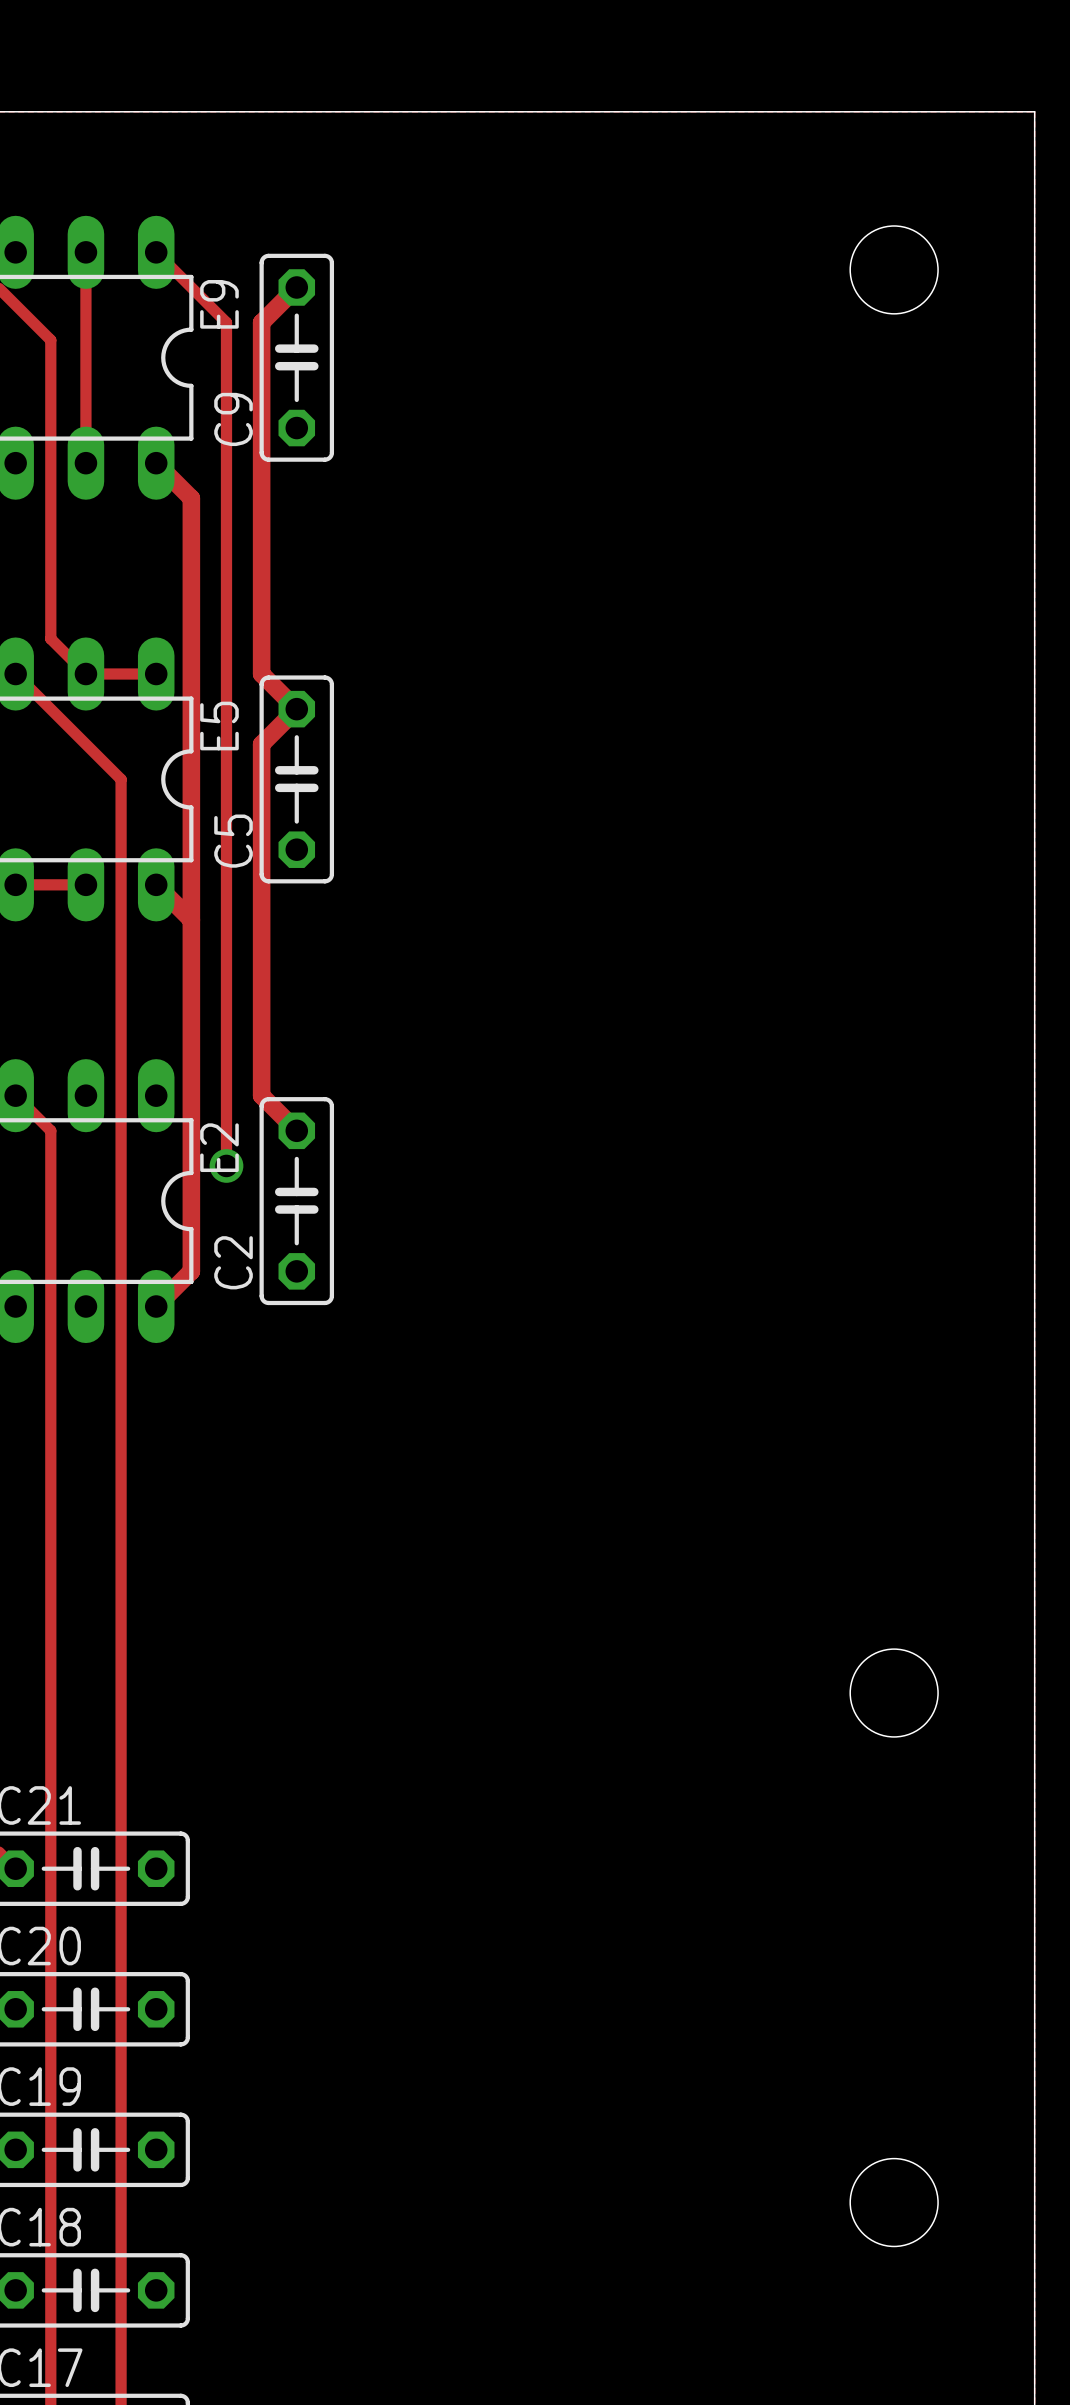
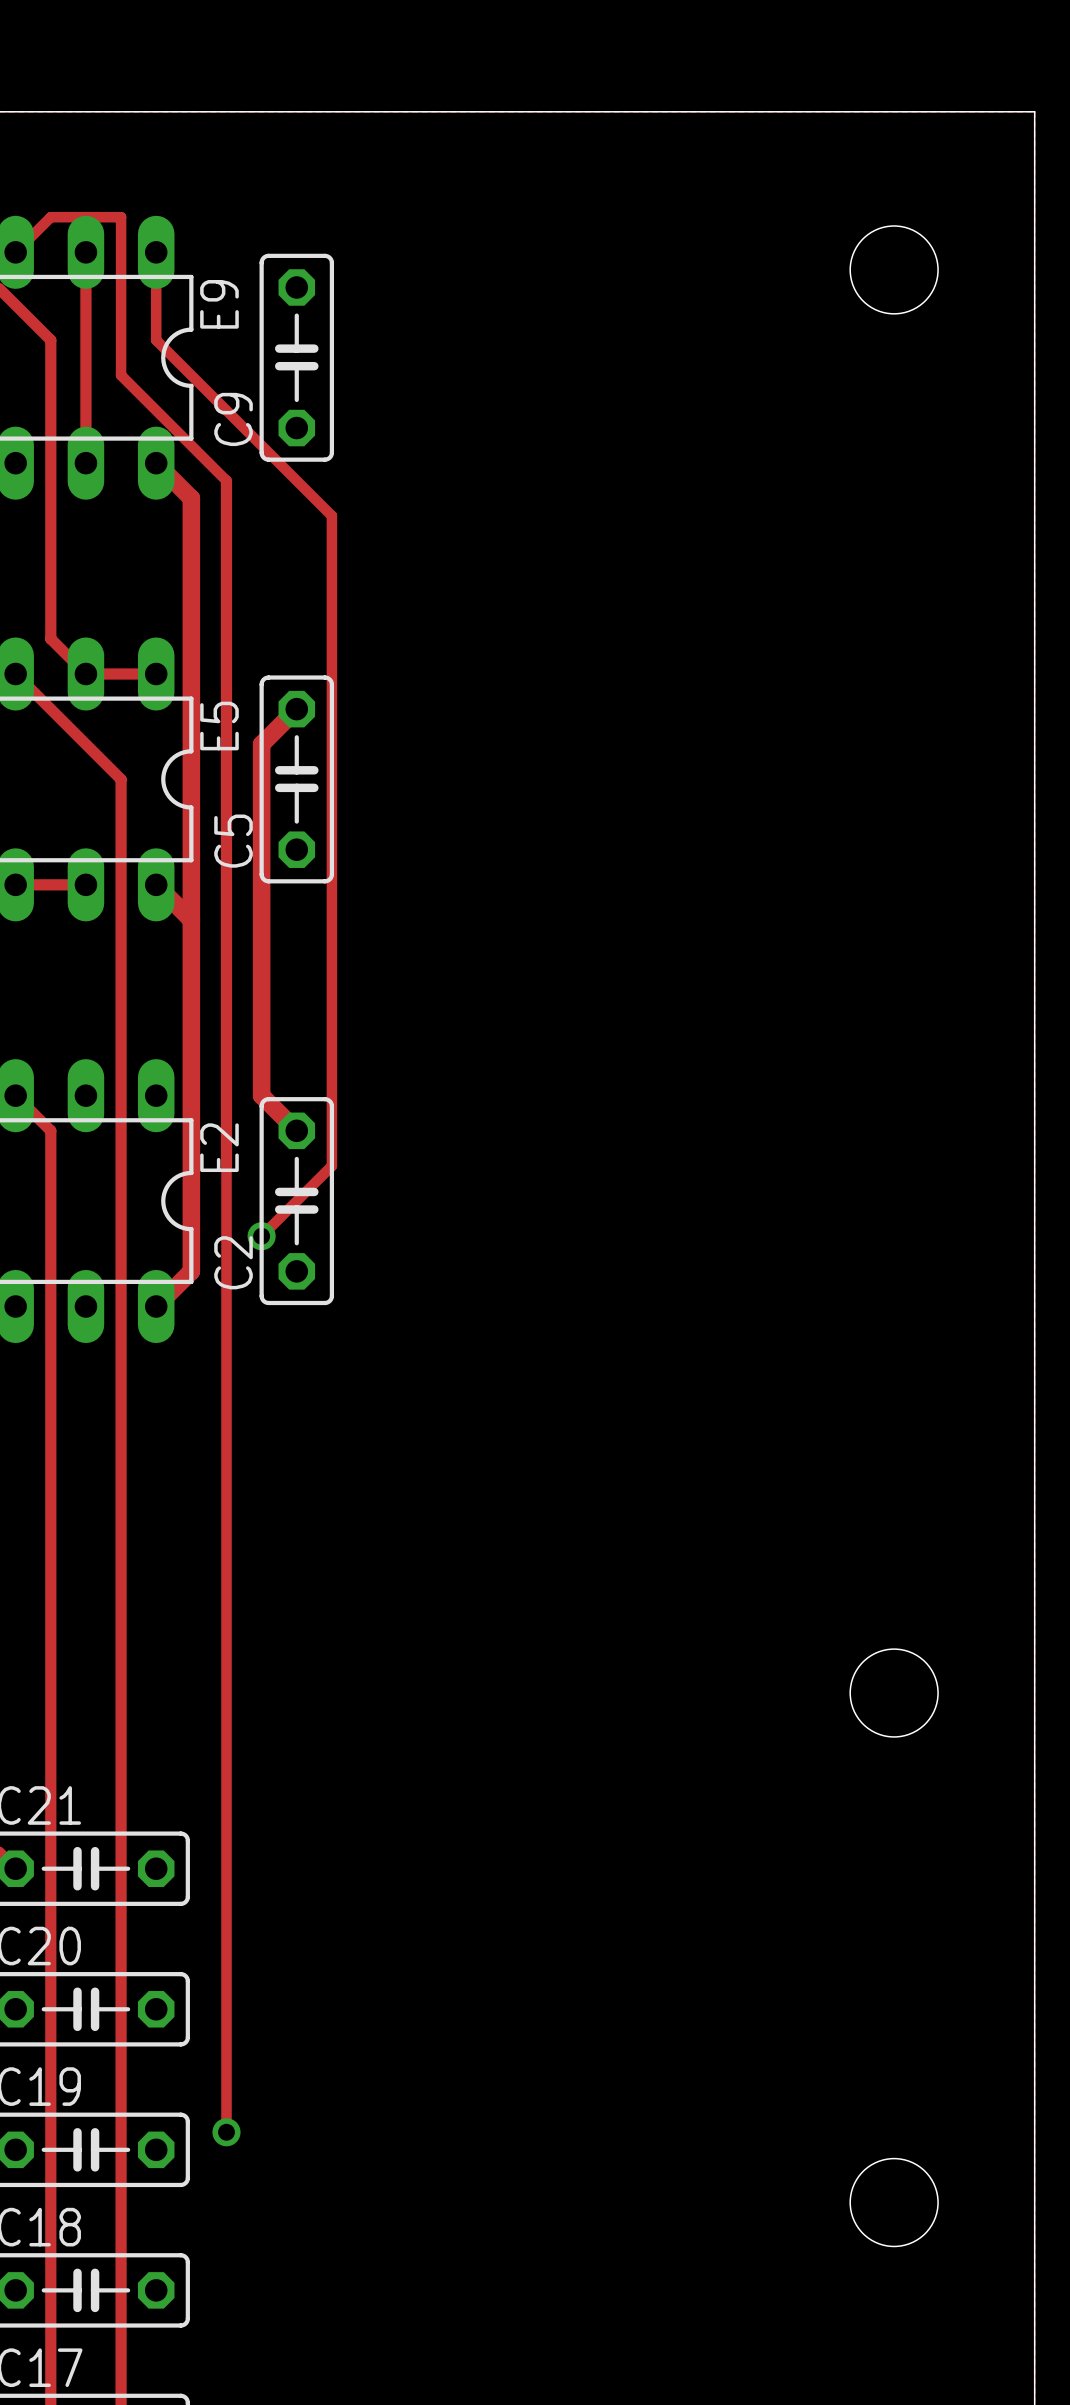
track: (156, 252) (226, 322) (226, 480) -> (15, 252) (50, 217) (121, 217) (121, 375) (226, 480)
track: none -> (156, 252) (156, 340) (331, 515) (331, 1165) (261, 1236)
track: (296, 287) (261, 322) (261, 674) (296, 709) -> none
track: none -> (226, 1165) (226, 2132)
via: (226, 1165) -> none
via: none -> (261, 1236)
via: none -> (226, 2132)

